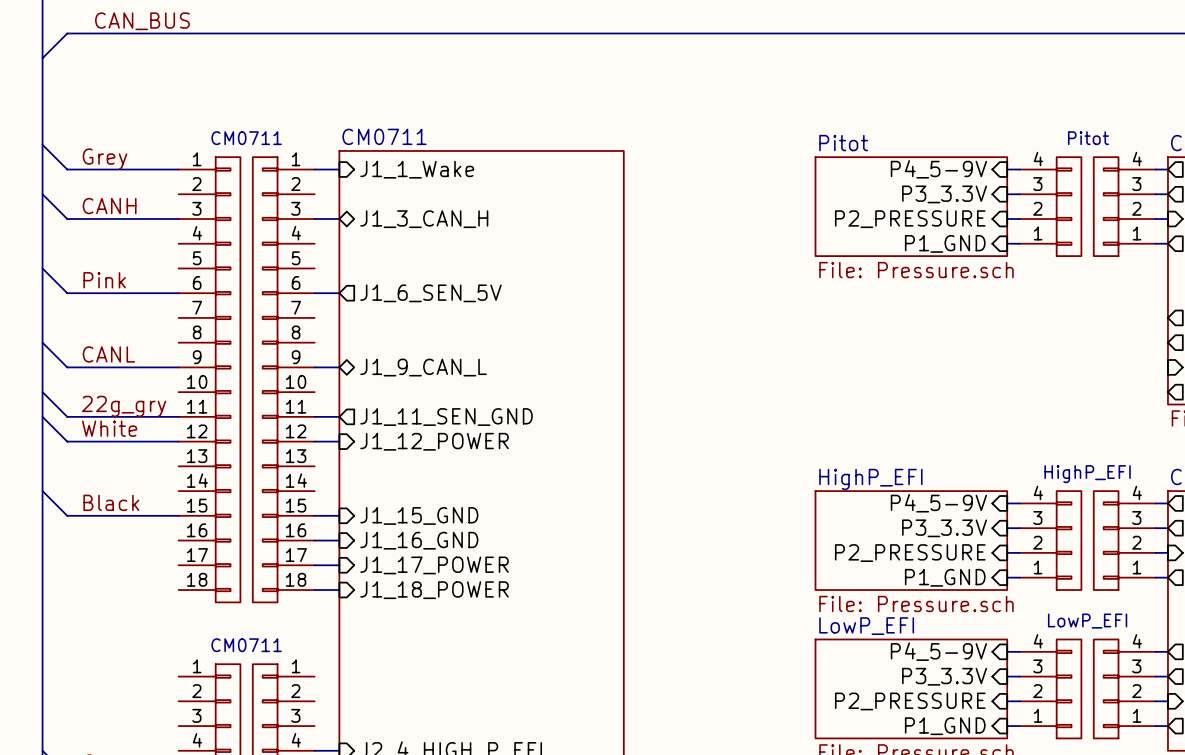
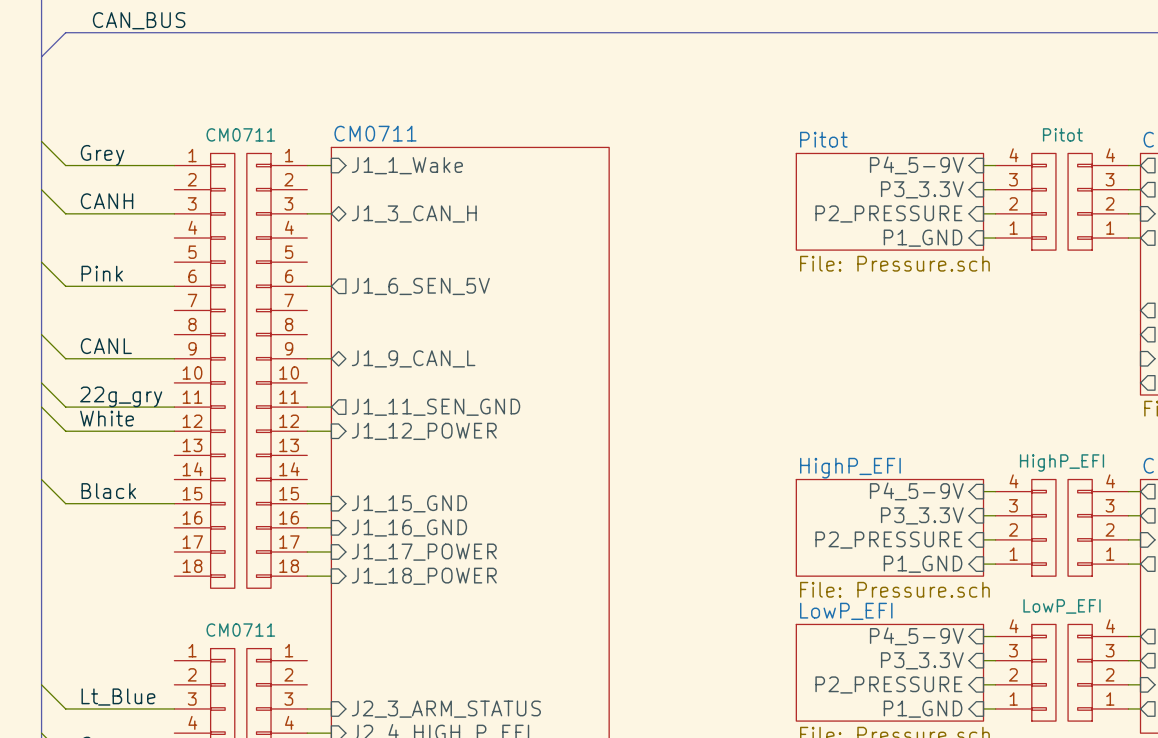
wire: none -> (41, 684) (65, 708) (174, 708)
label: none -> Lt_Blue (118, 697)
wire: none -> (307, 708) (331, 708)
sheet pin: none -> J2_3_ARM_STATUS (446, 709)

